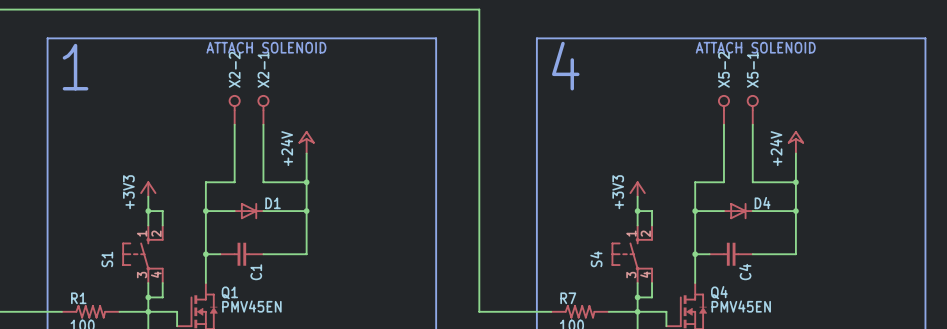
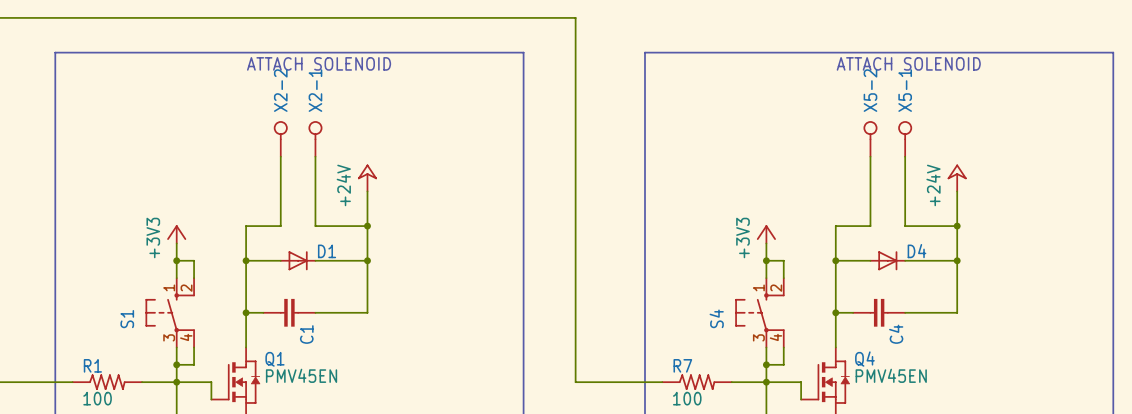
text: 4 (565, 66) -> none
text: 1 (75, 67) -> none

